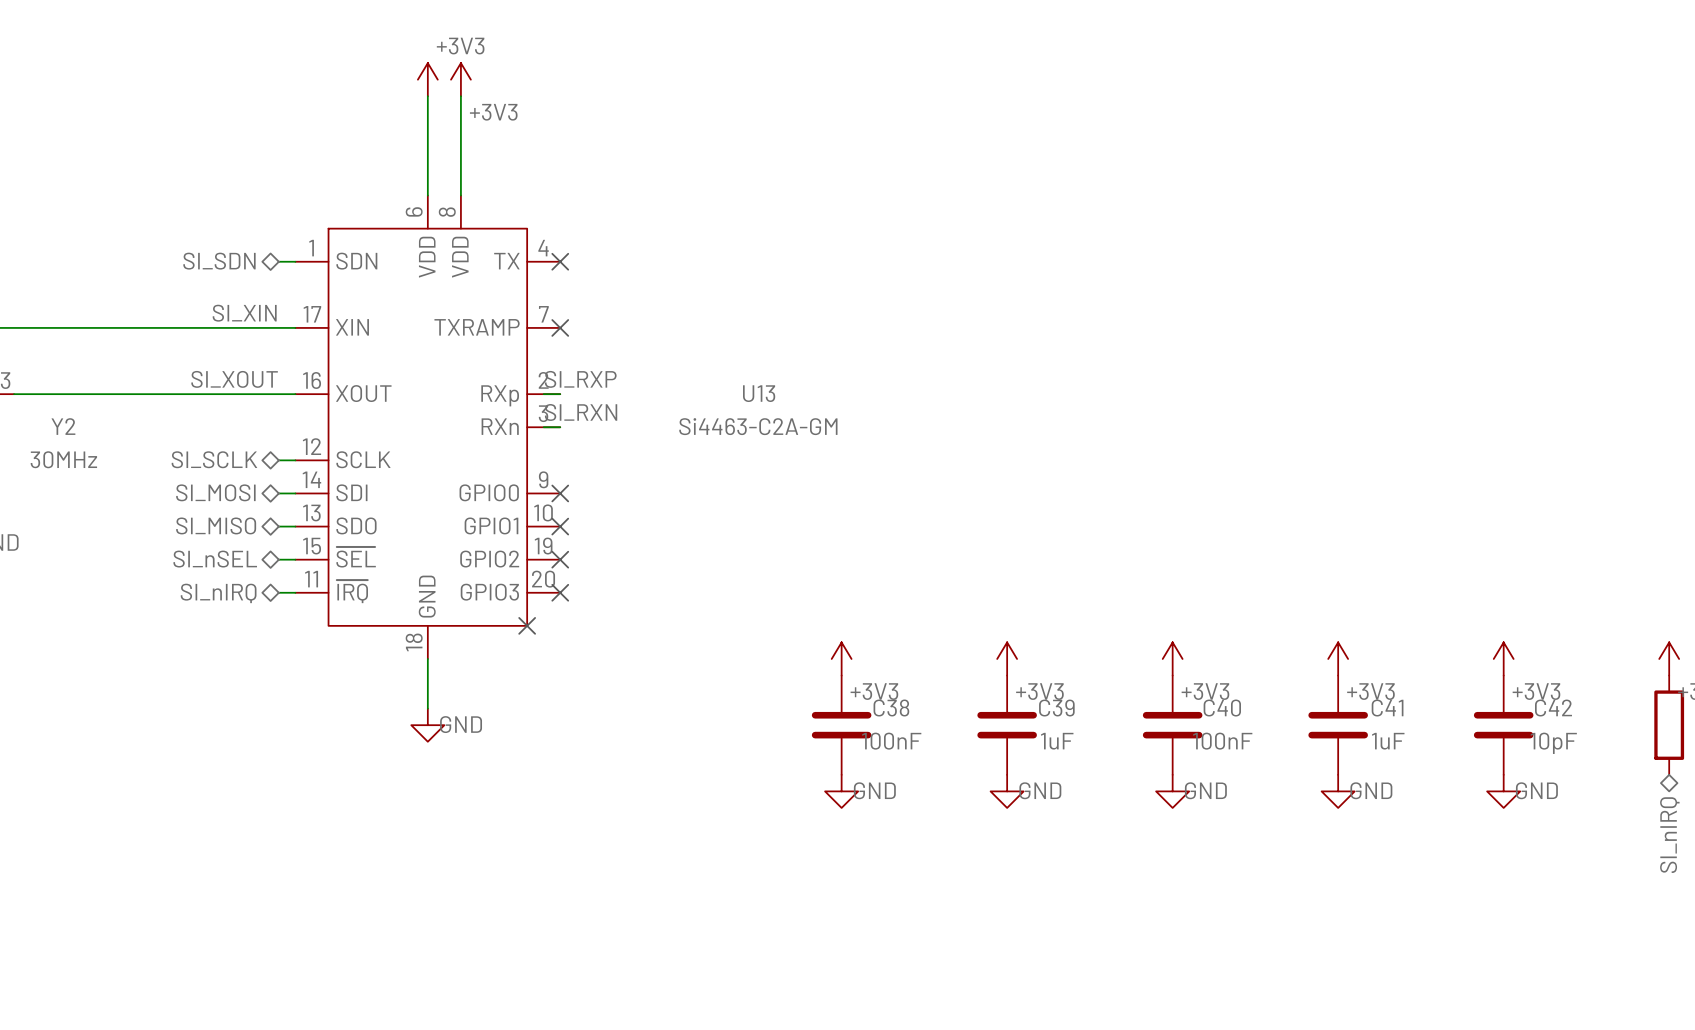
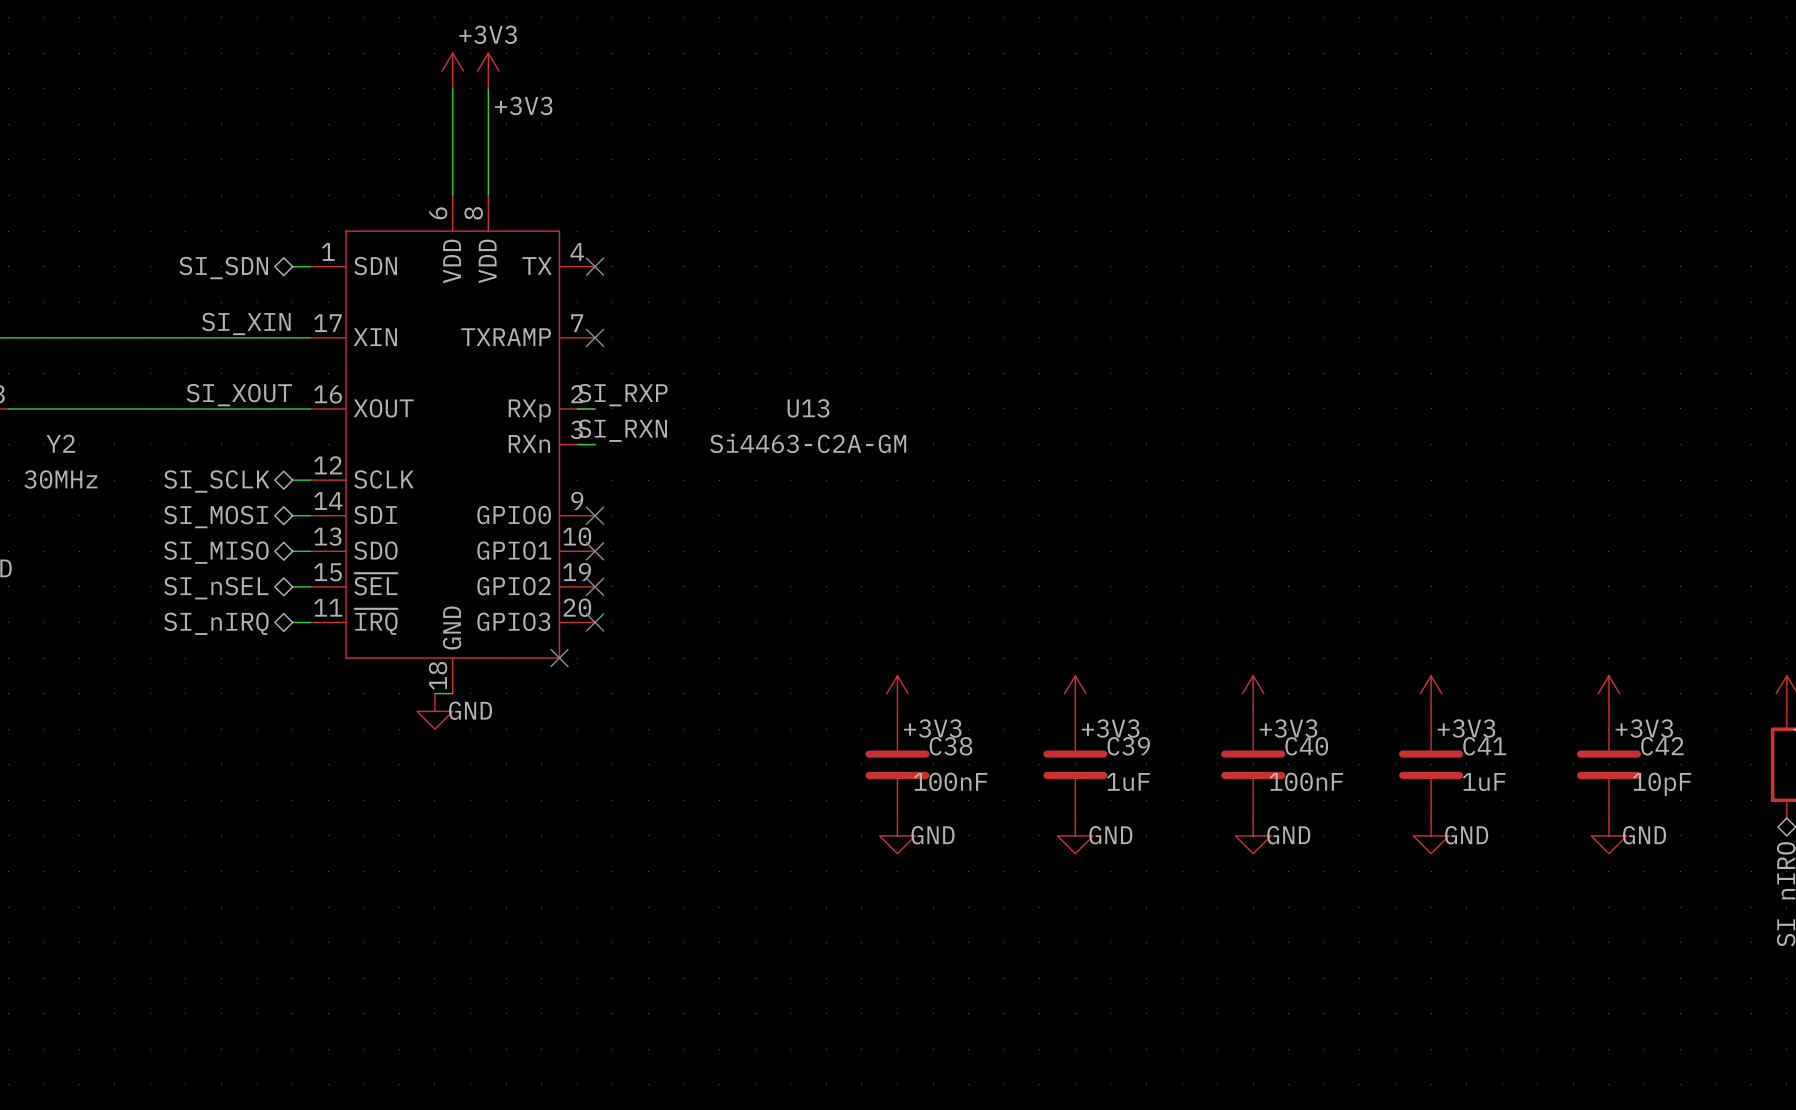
wire: (427, 658) (427, 708) -> (452, 693) (434, 693)
power symbol position: GND (427, 725) -> GND (434, 711)

